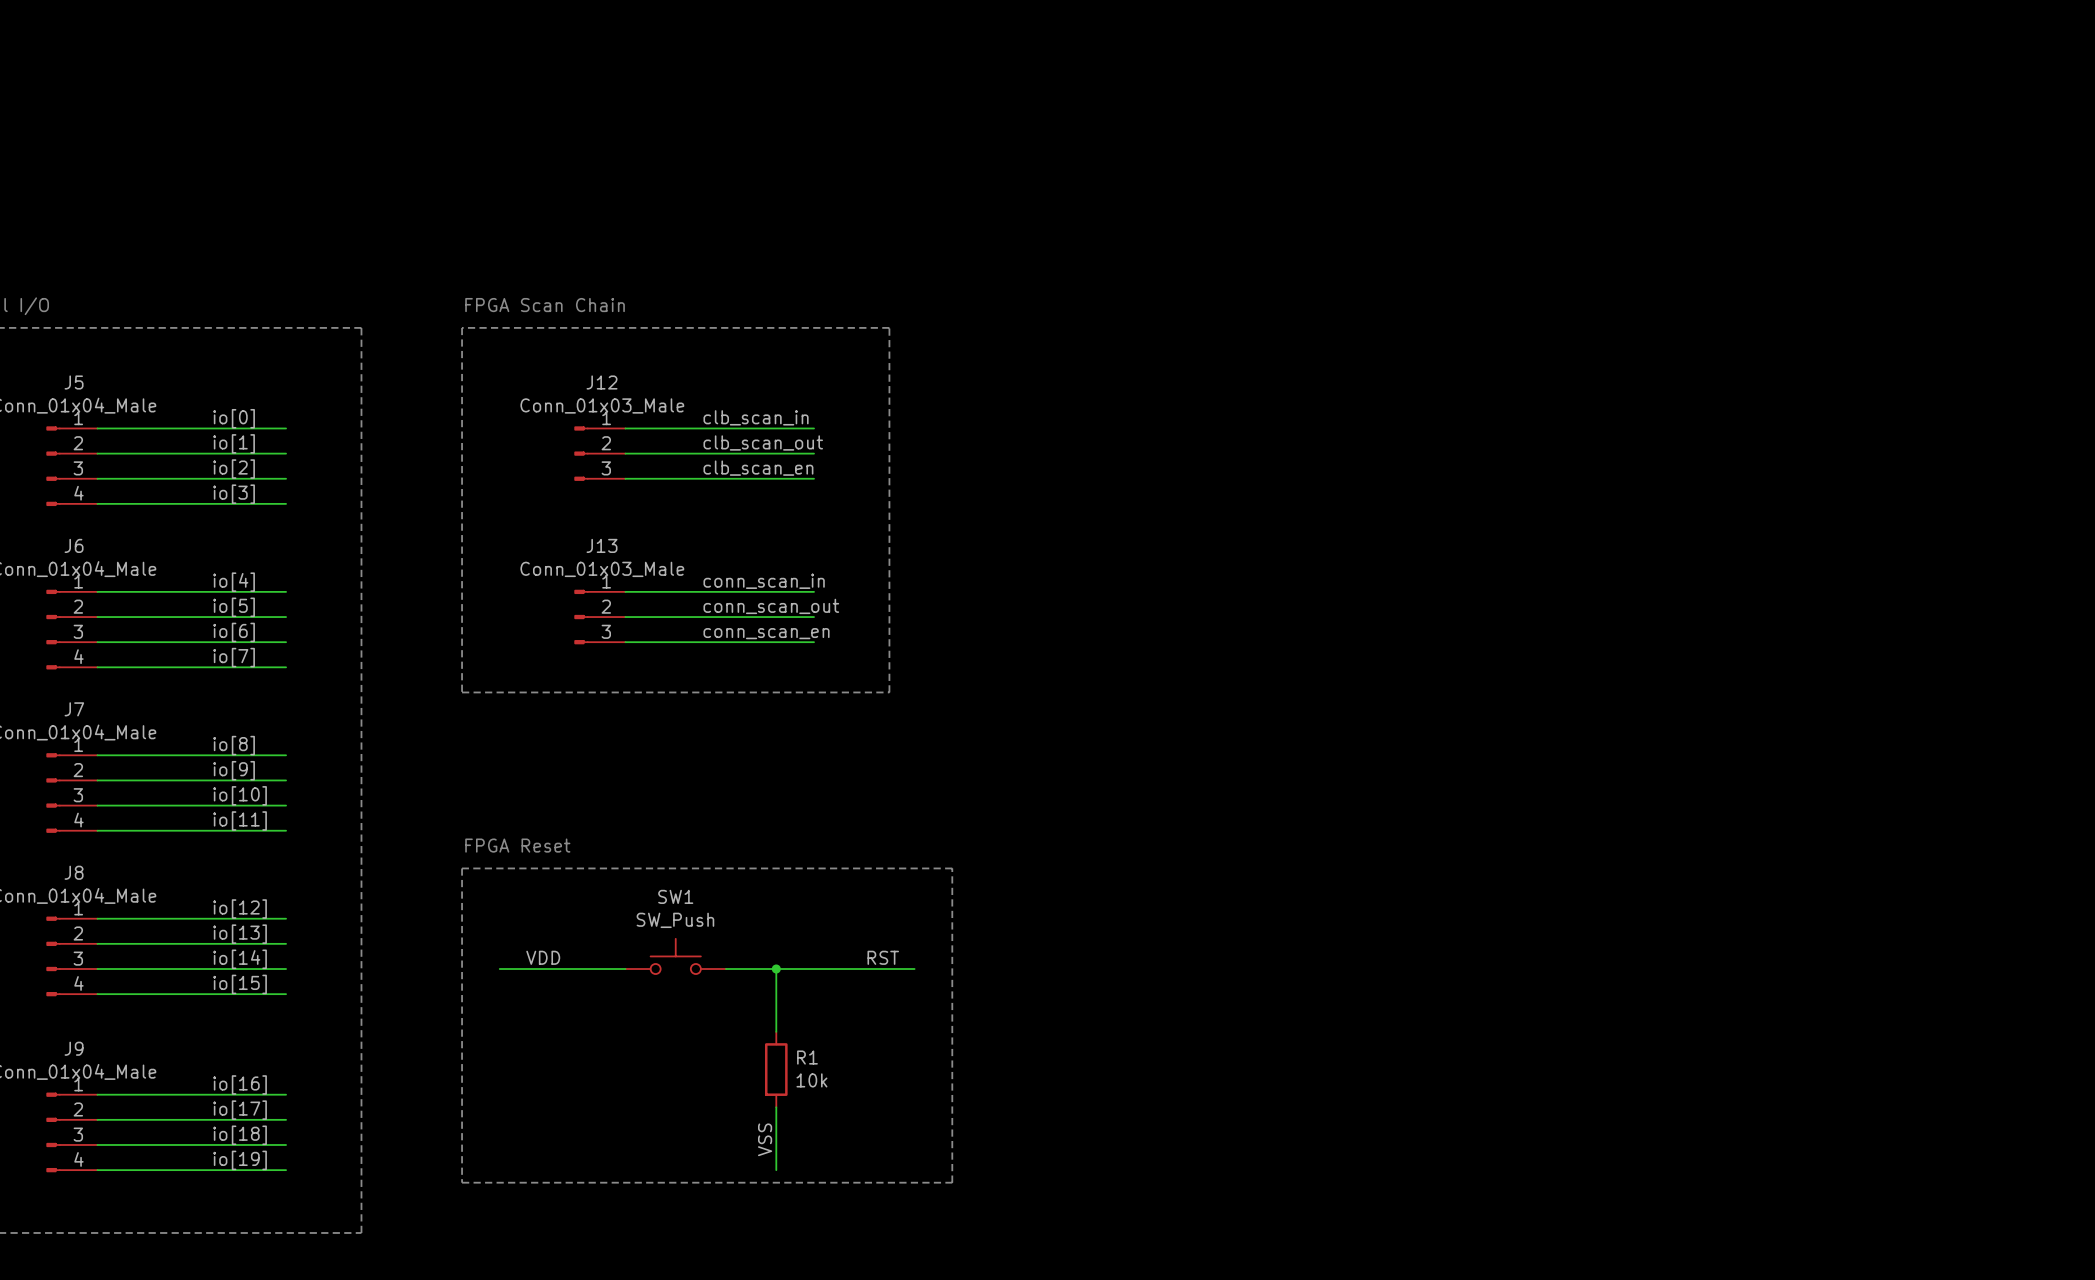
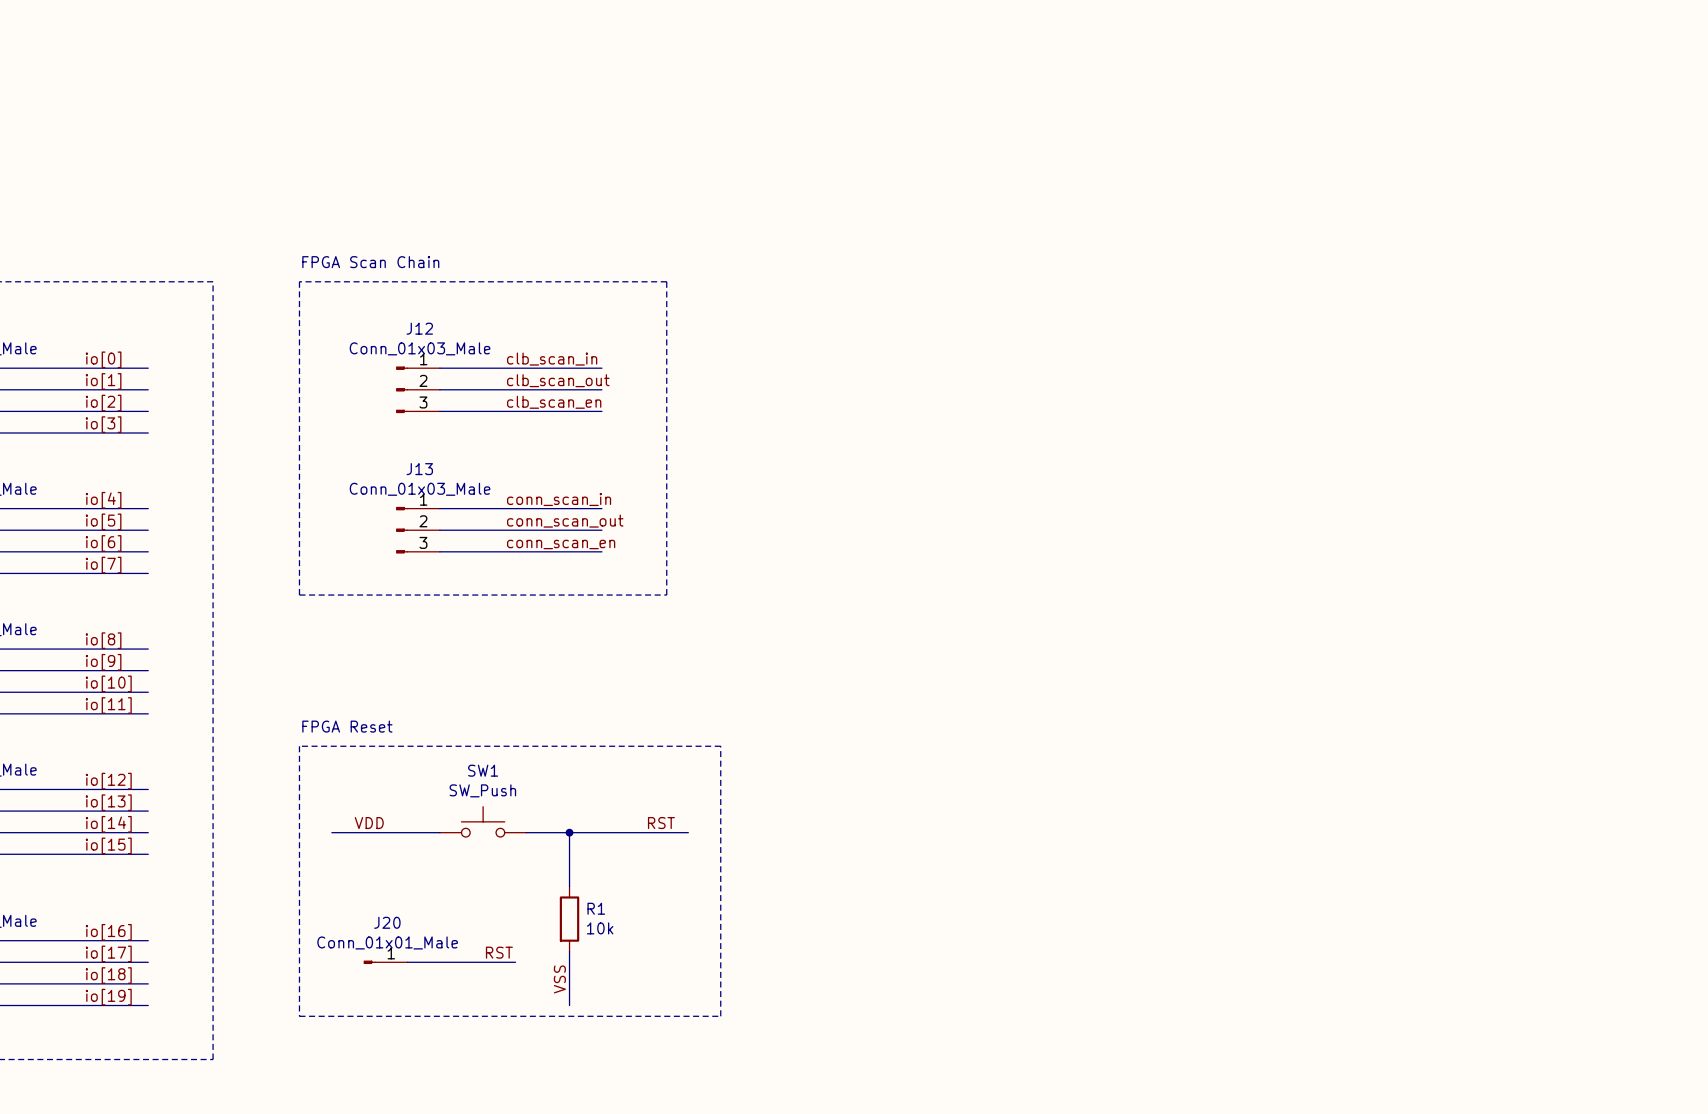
label: none -> RST (499, 952)
J20: none -> Conn_01x01_Male (385, 962)
wire: none -> (407, 962) (515, 962)

